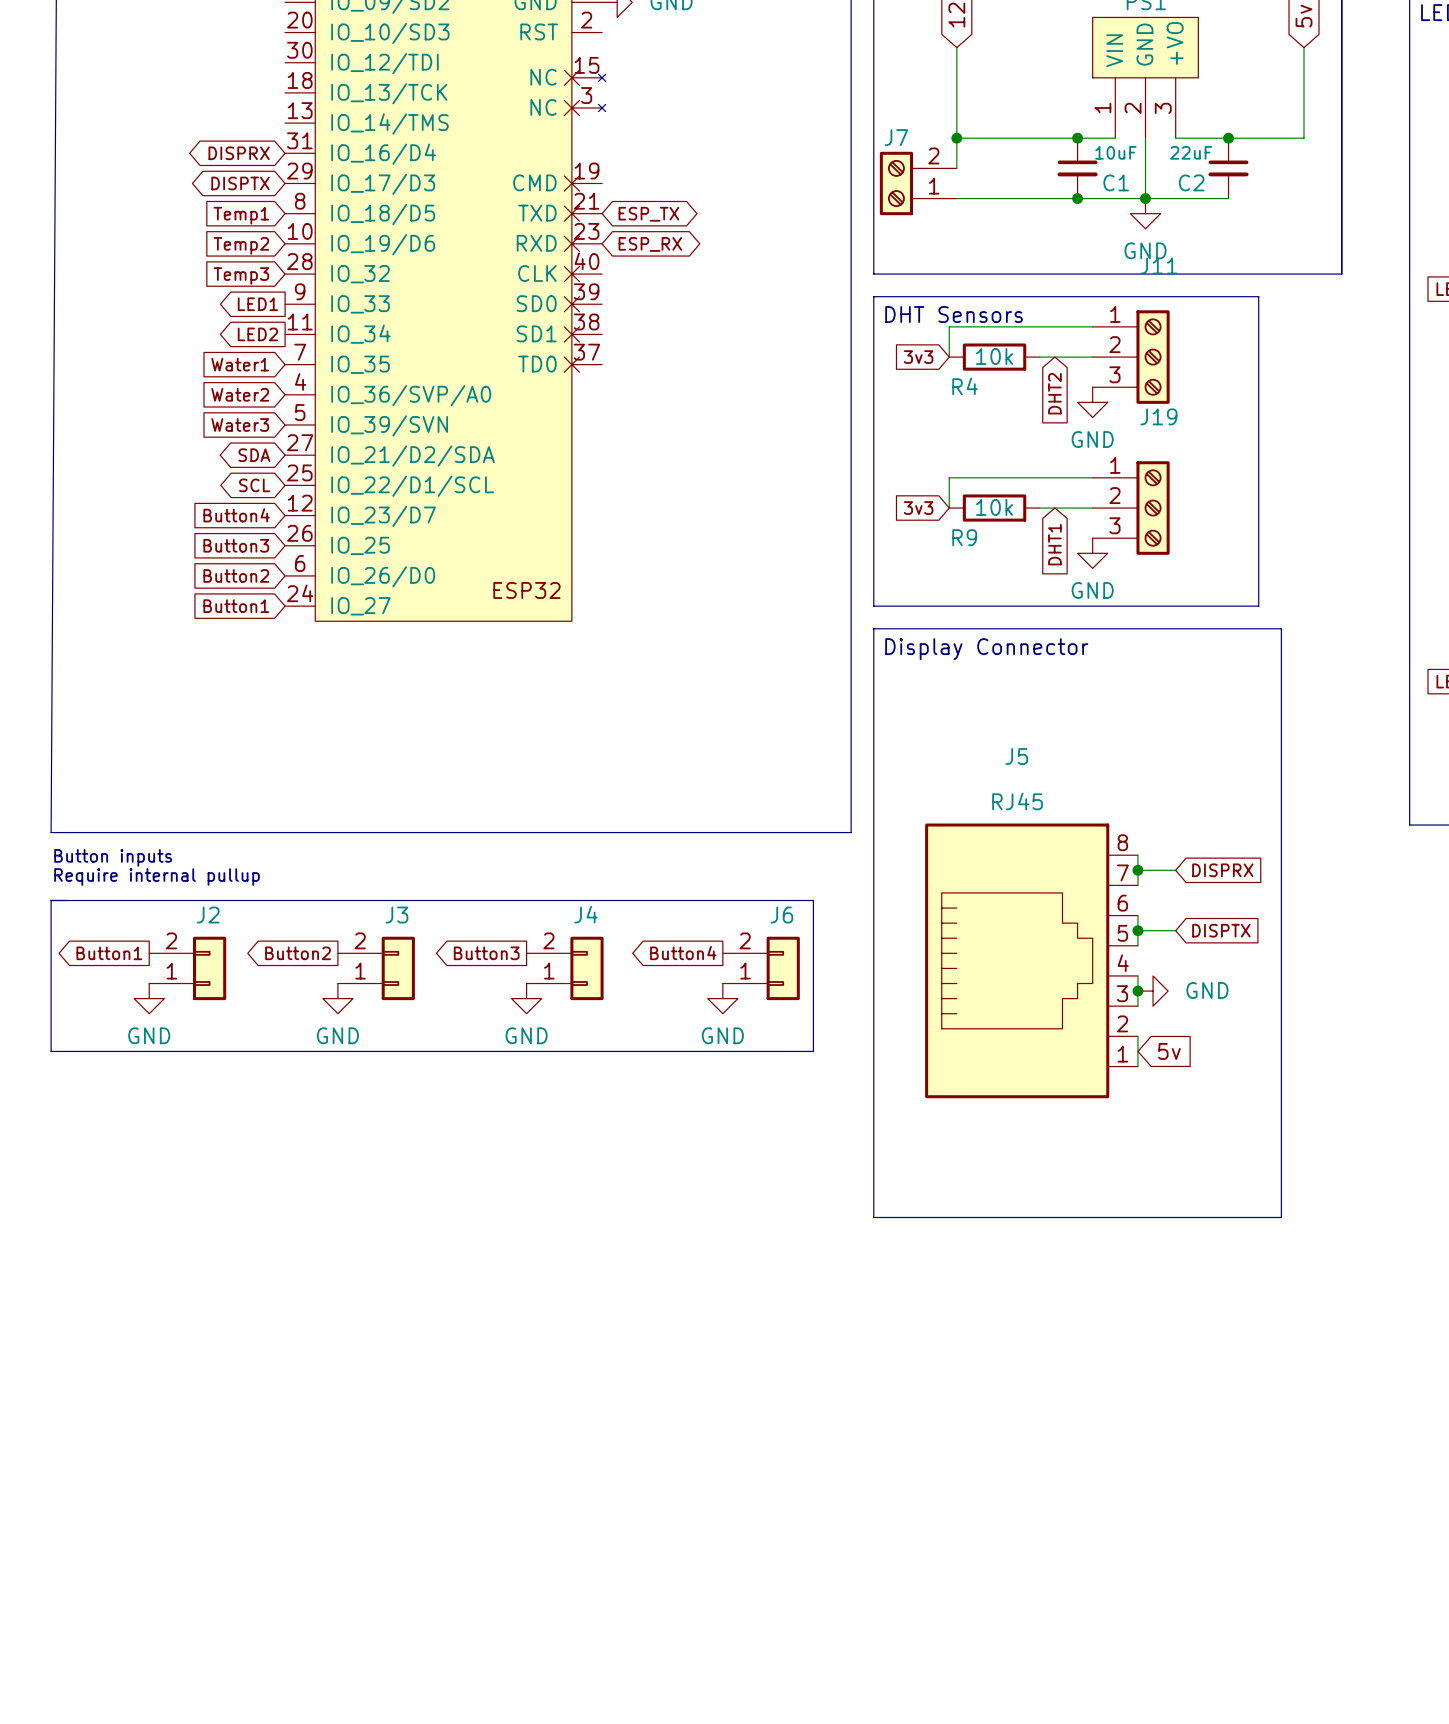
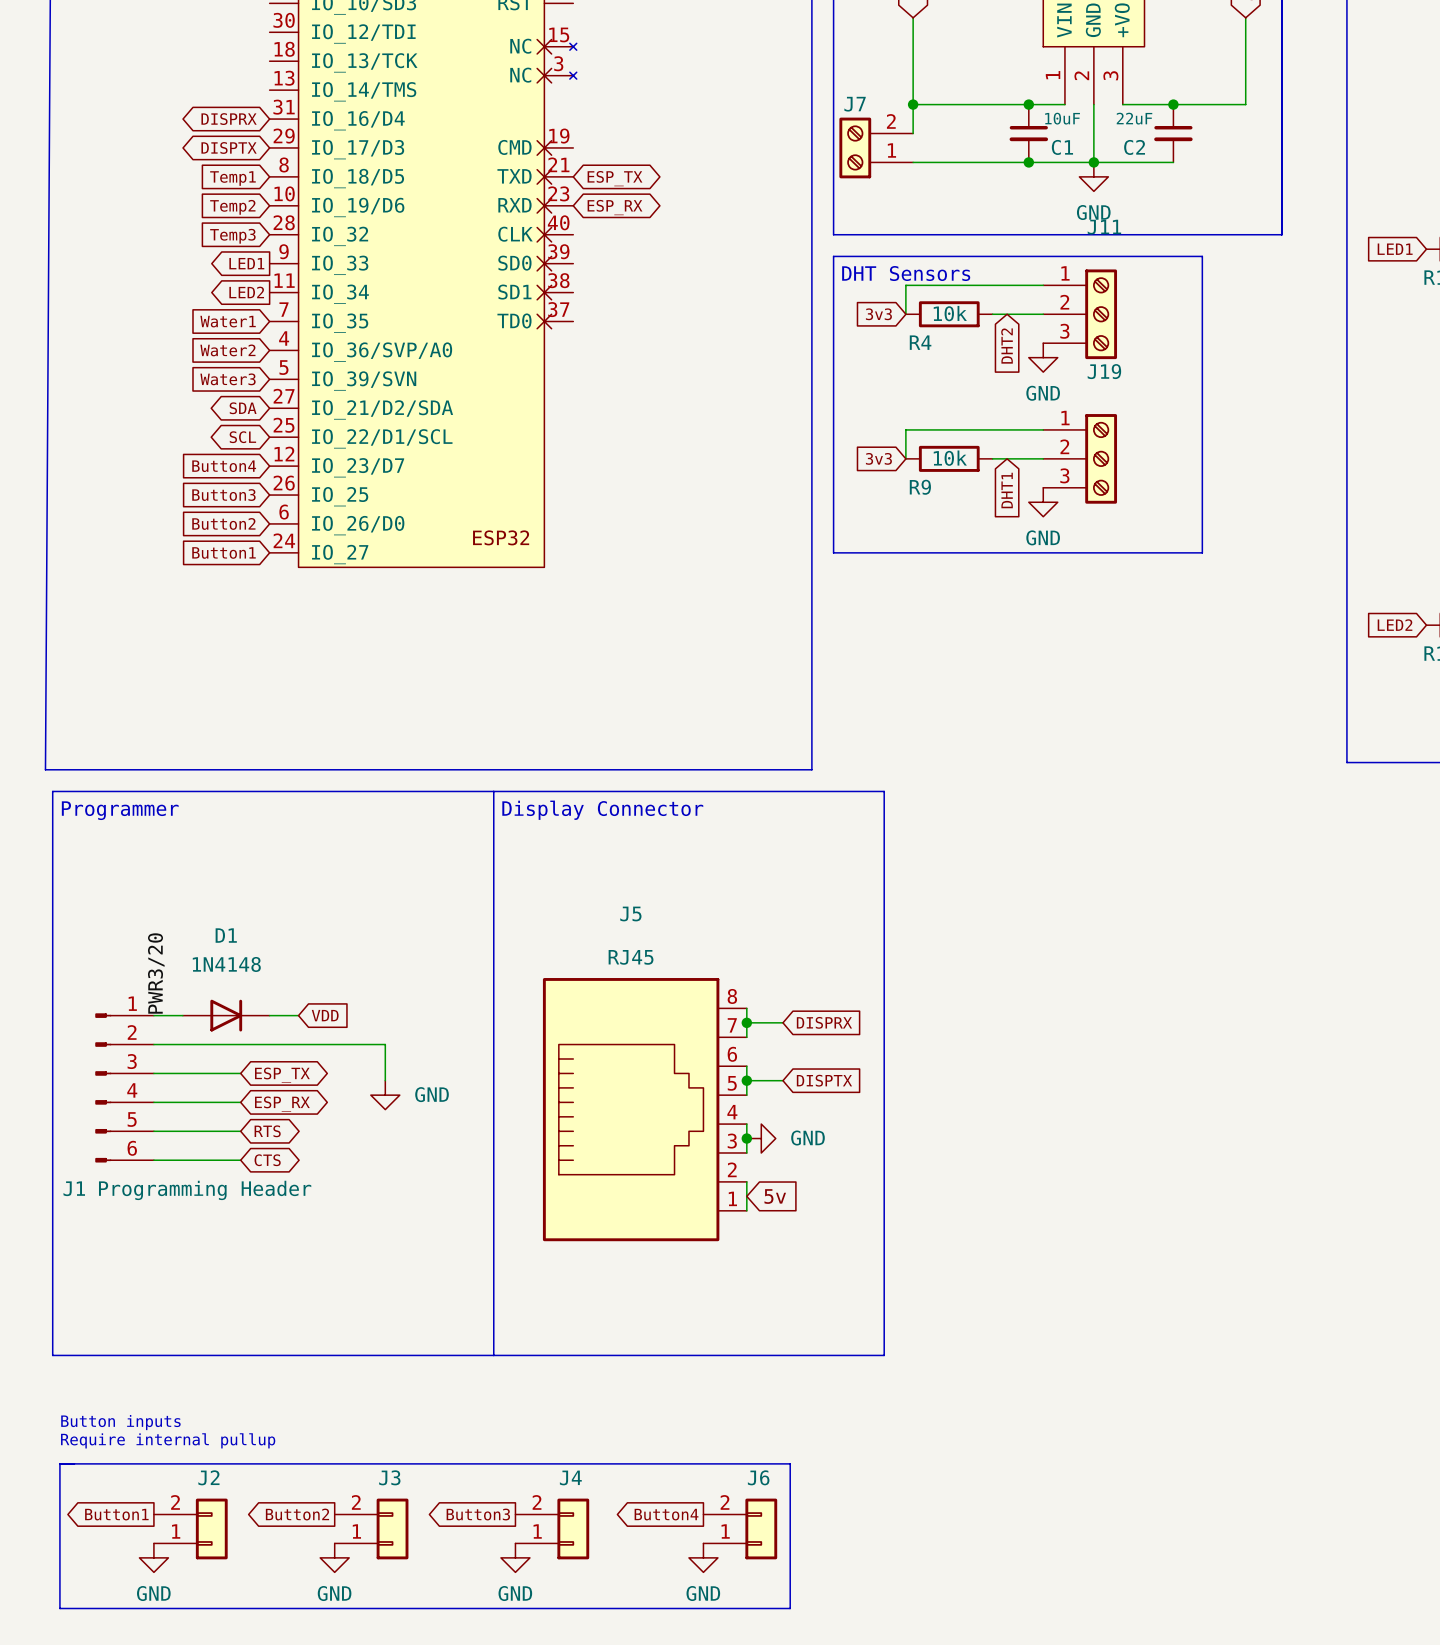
line: (873, 628) (1281, 628) (1281, 1217) (873, 1217) (873, 628) -> none
text: Display Connector (986, 649) -> none
line: none -> (52, 791) (52, 1355) (884, 1355) (884, 791) (52, 791)
line: none -> (493, 791) (493, 1355)
wire: (1137, 855) (1137, 885) -> none
text: Button inputs (113, 857) -> none
wire: (1137, 870) (1175, 870) -> none
junction: (1137, 870) -> none
global label: DISPRX (1222, 870) -> none
text: none -> Programmer (120, 810)
text: none -> Display Connector (602, 810)
text: Require internal pullup (157, 877) -> none
line: (51, 900) (51, 1051) (813, 1051) (813, 900) (51, 900) -> none
wire: (1137, 915) (1137, 945) -> none
wire: (1137, 930) (1175, 930) -> none
junction: (1137, 930) -> none
global label: DISPTX (1221, 930) -> none
global label: Button1 (109, 953) -> none
global label: Button2 (298, 953) -> none
global label: Button3 (486, 953) -> none
global label: Button4 (683, 953) -> none
J5 position: (1031, 960) -> (644, 1109)
J2 position: (187, 968) -> (190, 1528)
J3 position: (376, 968) -> (371, 1528)
J4 position: (565, 968) -> (552, 1528)
J6 position: (761, 968) -> (740, 1528)
wire: (1137, 975) (1137, 1006) -> none
junction: (1137, 991) -> none
power symbol: GND (1153, 991) -> none
power symbol: GND (149, 998) -> none
power symbol: GND (337, 998) -> none
power symbol: GND (526, 998) -> none
power symbol: GND (722, 998) -> none
label: none -> PWR3/20 (156, 973)
wire: (1137, 1036) (1137, 1066) -> none
global label: 5v (1169, 1051) -> none
wire: none -> (746, 1008) (746, 1037)
wire: none -> (153, 1015) (182, 1015)
D1: none -> 1N4148 (226, 1015)
wire: none -> (269, 1015) (298, 1015)
global label: none -> VDD (325, 1015)
wire: none -> (746, 1022) (782, 1022)
junction: none -> (746, 1022)
global label: none -> DISPRX (824, 1022)
wire: none -> (153, 1044) (385, 1044) (385, 1080)
wire: none -> (746, 1066) (746, 1095)
wire: none -> (153, 1073) (240, 1073)
global label: none -> ESP_TX (282, 1075)
wire: none -> (746, 1080) (782, 1080)
junction: none -> (746, 1080)
global label: none -> DISPTX (824, 1080)
J1: none -> Programming Header (124, 1087)
power symbol: none -> GND (385, 1095)
wire: none -> (153, 1102) (240, 1102)
global label: none -> ESP_RX (282, 1104)
wire: none -> (746, 1124) (746, 1152)
wire: none -> (153, 1131) (240, 1131)
global label: none -> RTS (267, 1131)
junction: none -> (746, 1138)
power symbol: none -> GND (761, 1138)
wire: none -> (153, 1160) (240, 1160)
global label: none -> CTS (267, 1160)
wire: none -> (746, 1181) (746, 1210)
global label: none -> 5v (775, 1196)
text: none -> Button inputs (120, 1422)
text: none -> Require internal pullup (168, 1440)
line: none -> (59, 1463) (59, 1608) (790, 1608) (790, 1463) (59, 1463)
global label: none -> Button1 (116, 1514)
global label: none -> Button2 (297, 1514)
global label: none -> Button3 (478, 1514)
global label: none -> Button4 (666, 1514)
power symbol: none -> GND (153, 1557)
power symbol: none -> GND (334, 1557)
power symbol: none -> GND (515, 1557)
power symbol: none -> GND (703, 1557)

